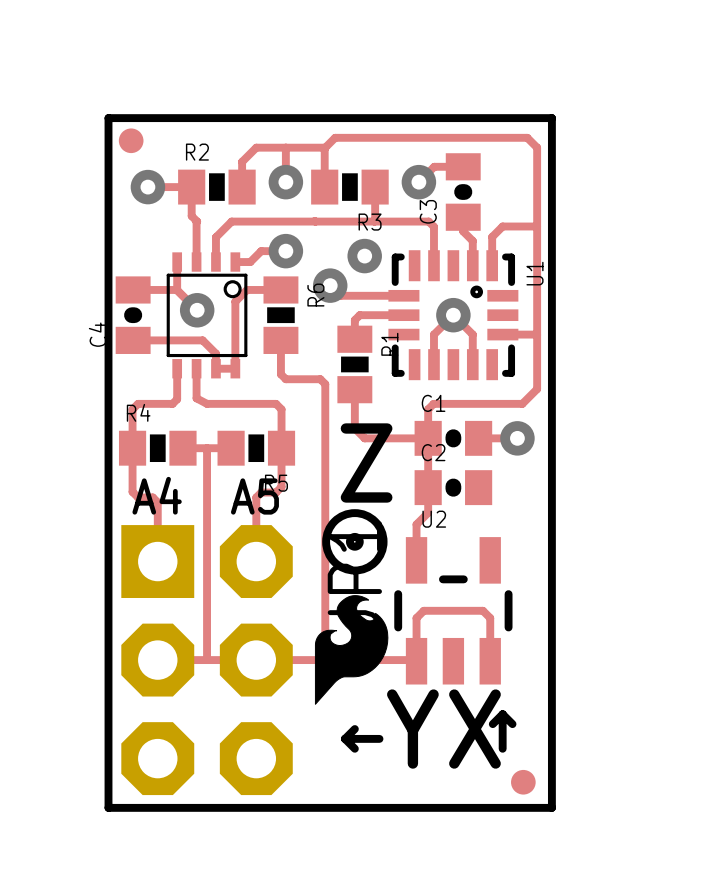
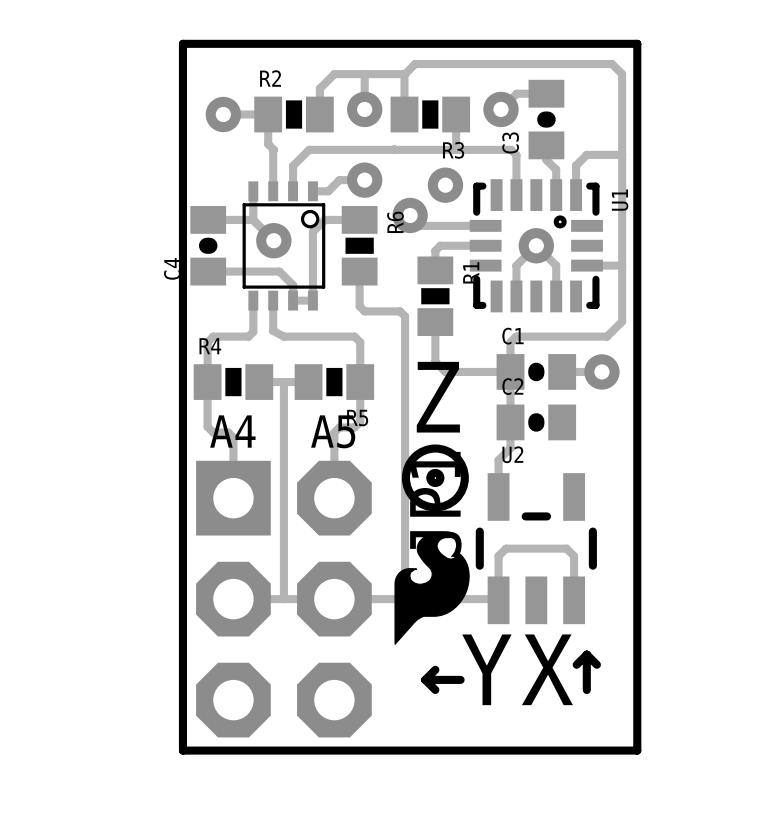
part: (131, 140) -> none
part: (523, 782) -> none

